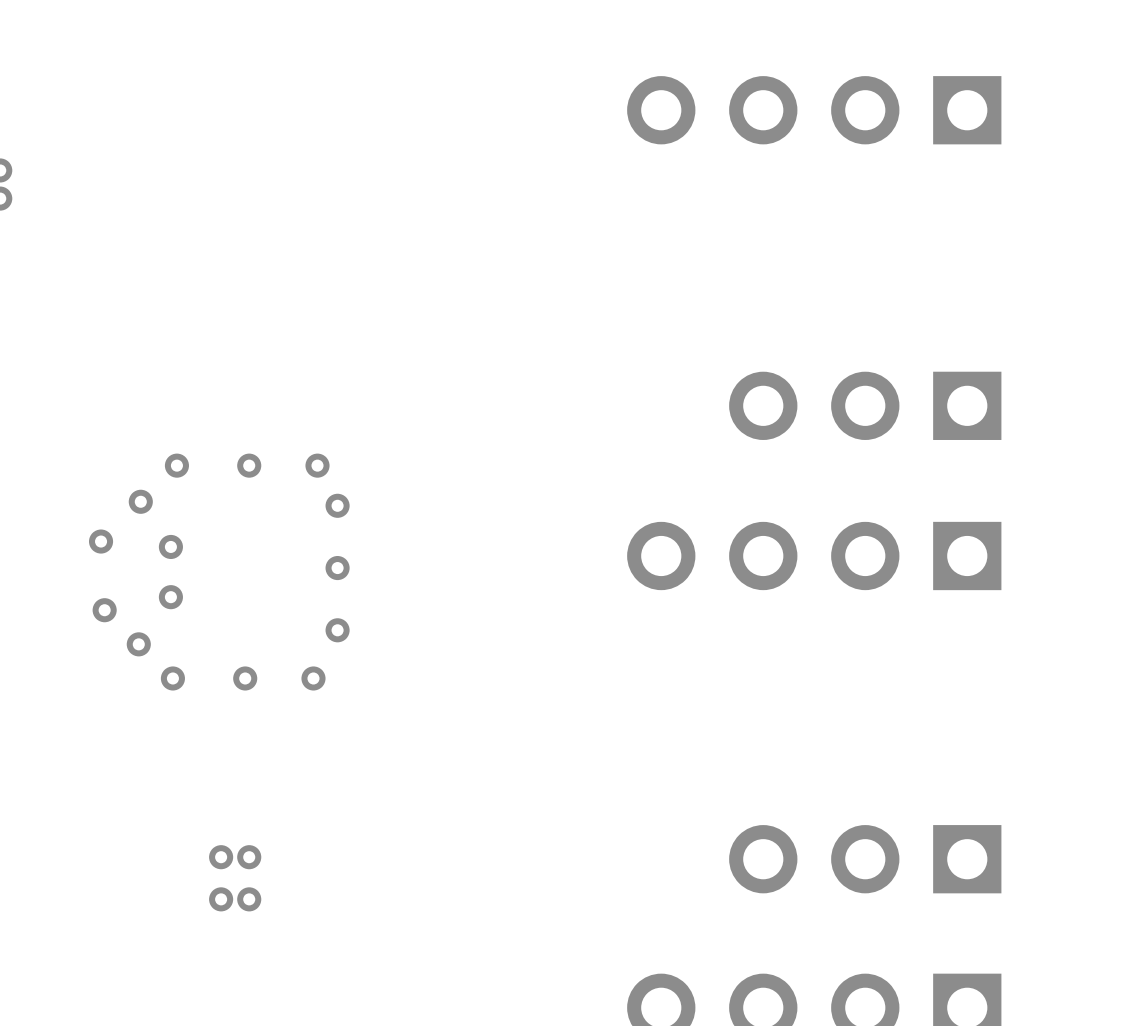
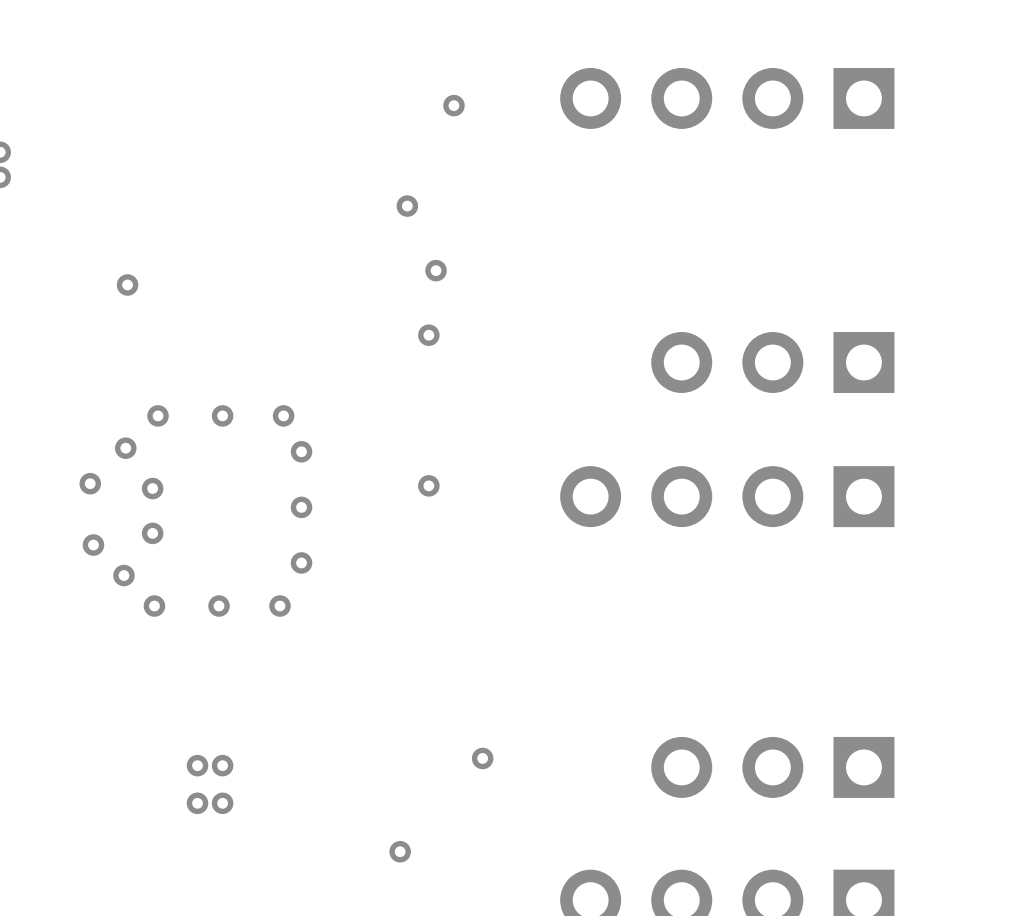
via: none -> (453, 105)
via: none -> (407, 206)
via: none -> (436, 270)
via: none -> (127, 284)
via: none -> (428, 335)
via: none -> (428, 485)
via: none -> (482, 758)
via: none -> (400, 851)

